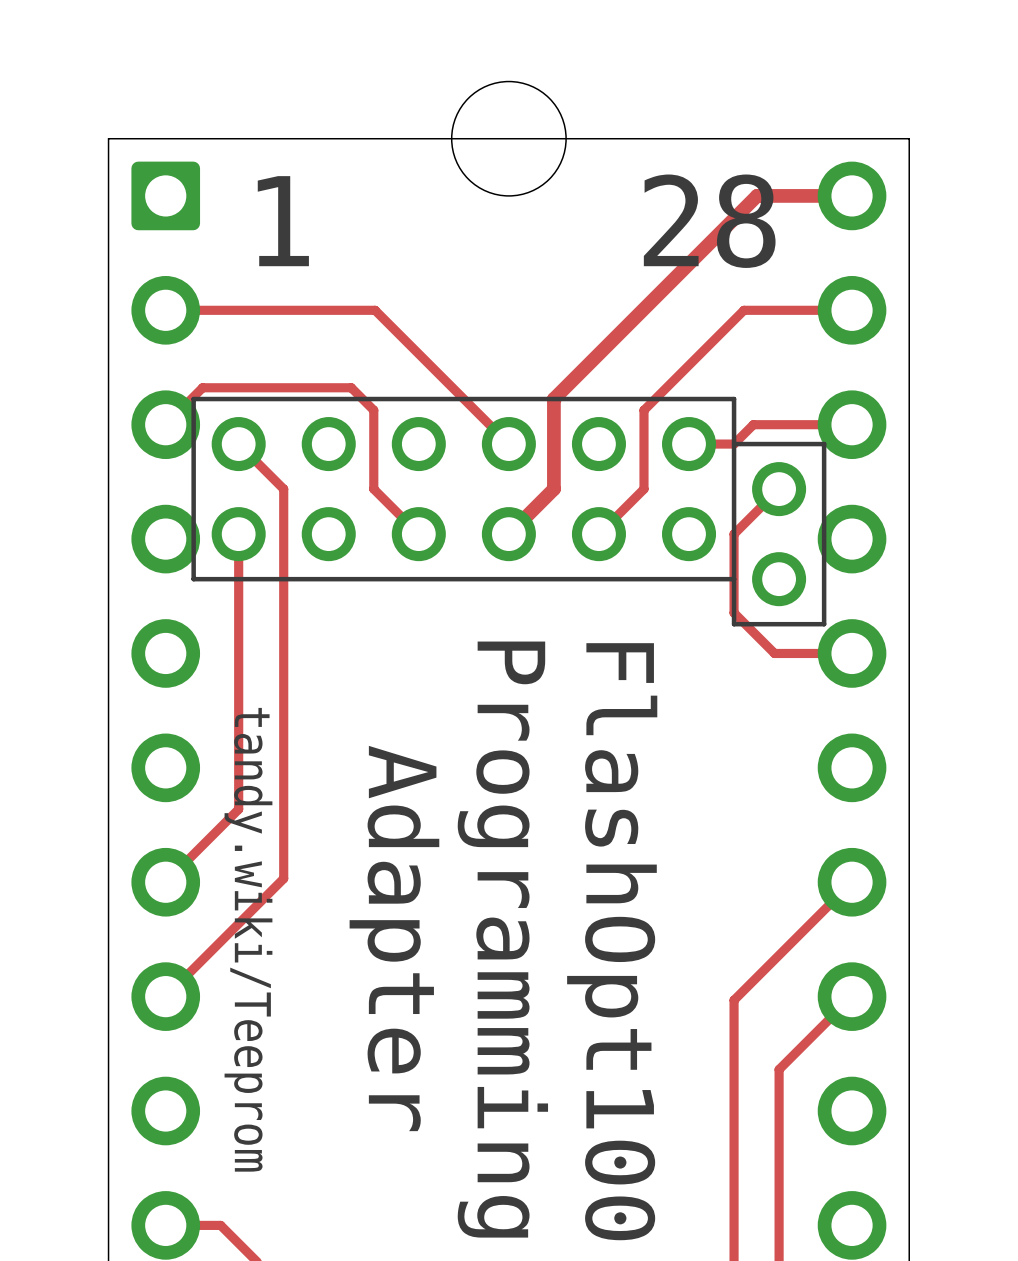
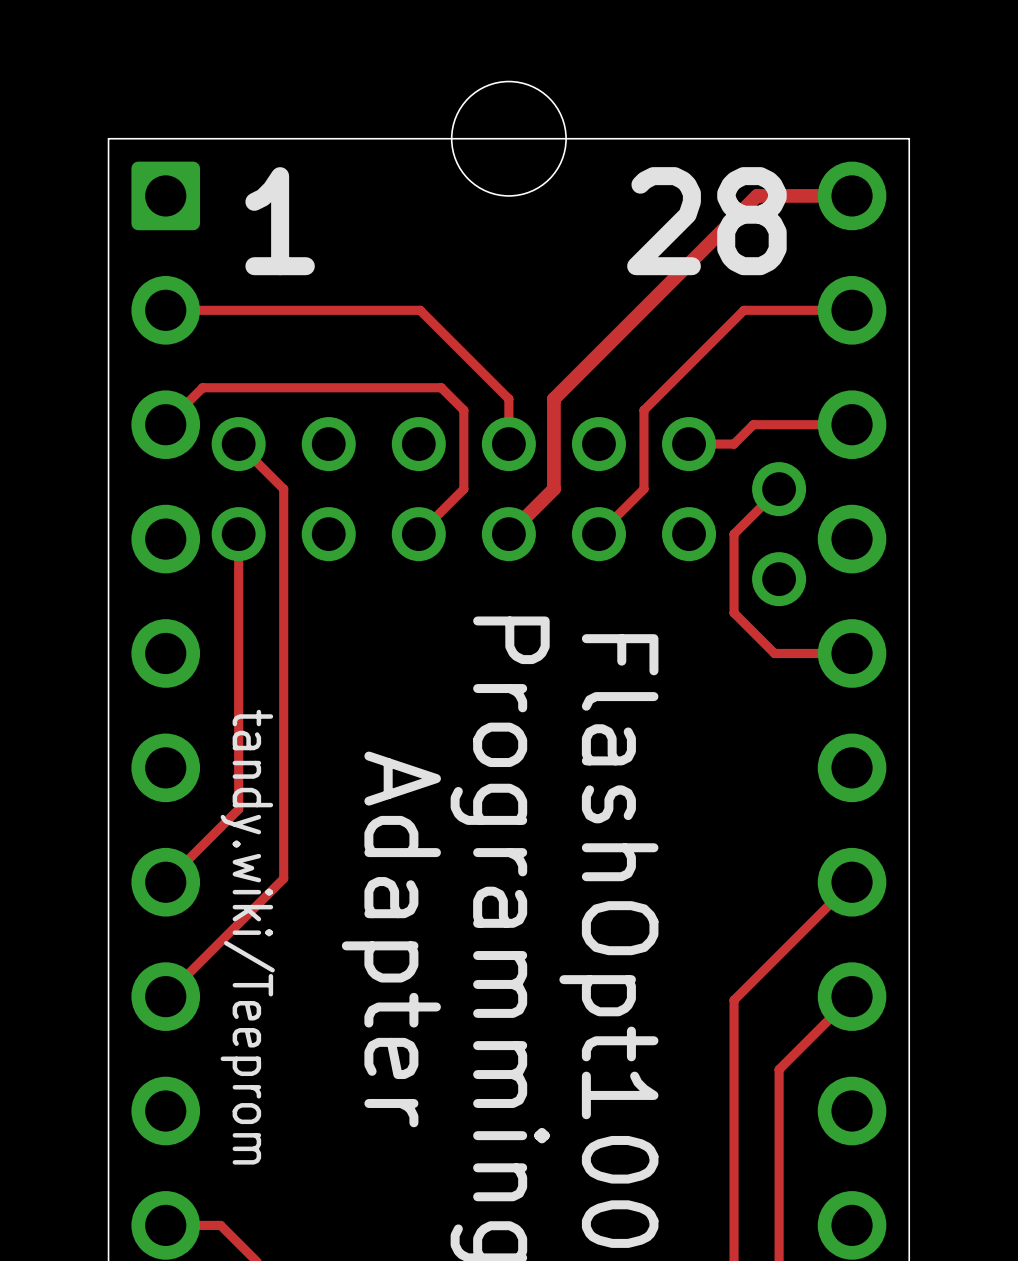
track: (375, 310) (508, 444) -> (375, 310) (420, 310) (508, 399) (508, 444)
track: (351, 387) (373, 410) (373, 489) (418, 534) -> (351, 387) (441, 387) (463, 410) (463, 489) (418, 534)
line: (734, 444) (824, 444) (824, 624) (734, 624) (734, 399) (193, 399) (193, 579) (734, 579) -> none

